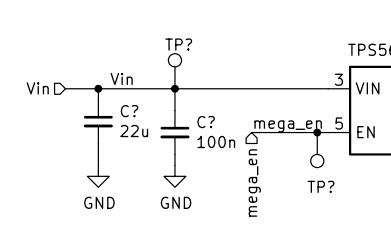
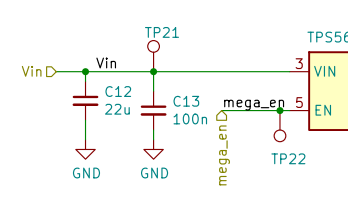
TP? name: TP? (178, 44) -> TP21 (161, 32)
C? name: C? (129, 111) -> C12 (118, 91)
C? name: C? (206, 122) -> C13 (186, 101)
TP? name: TP? (320, 186) -> TP22 (288, 158)

